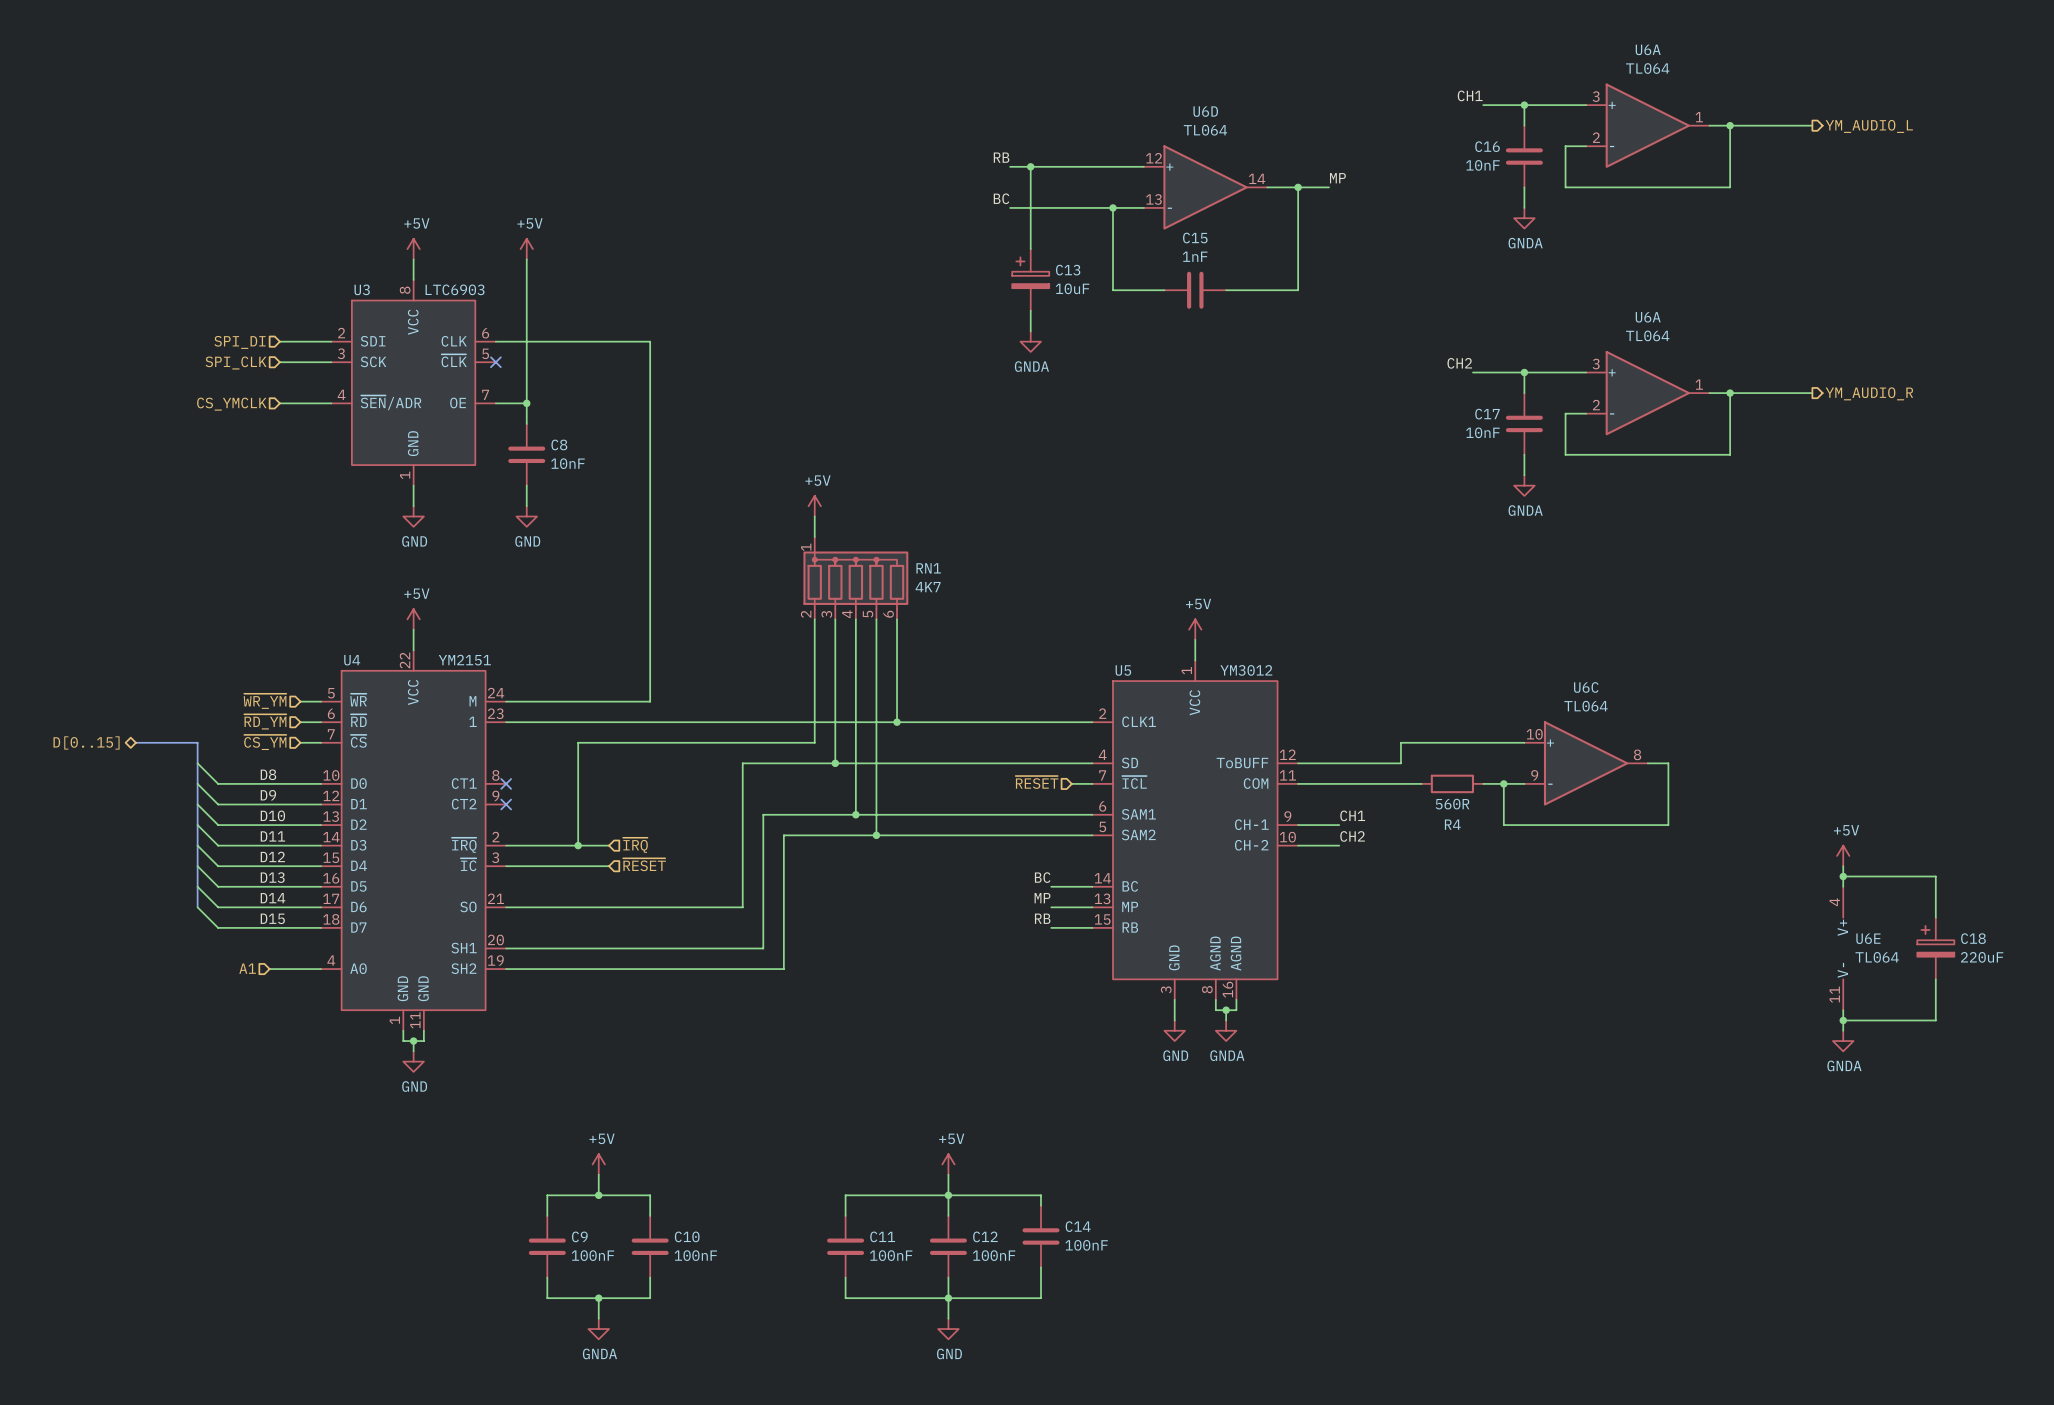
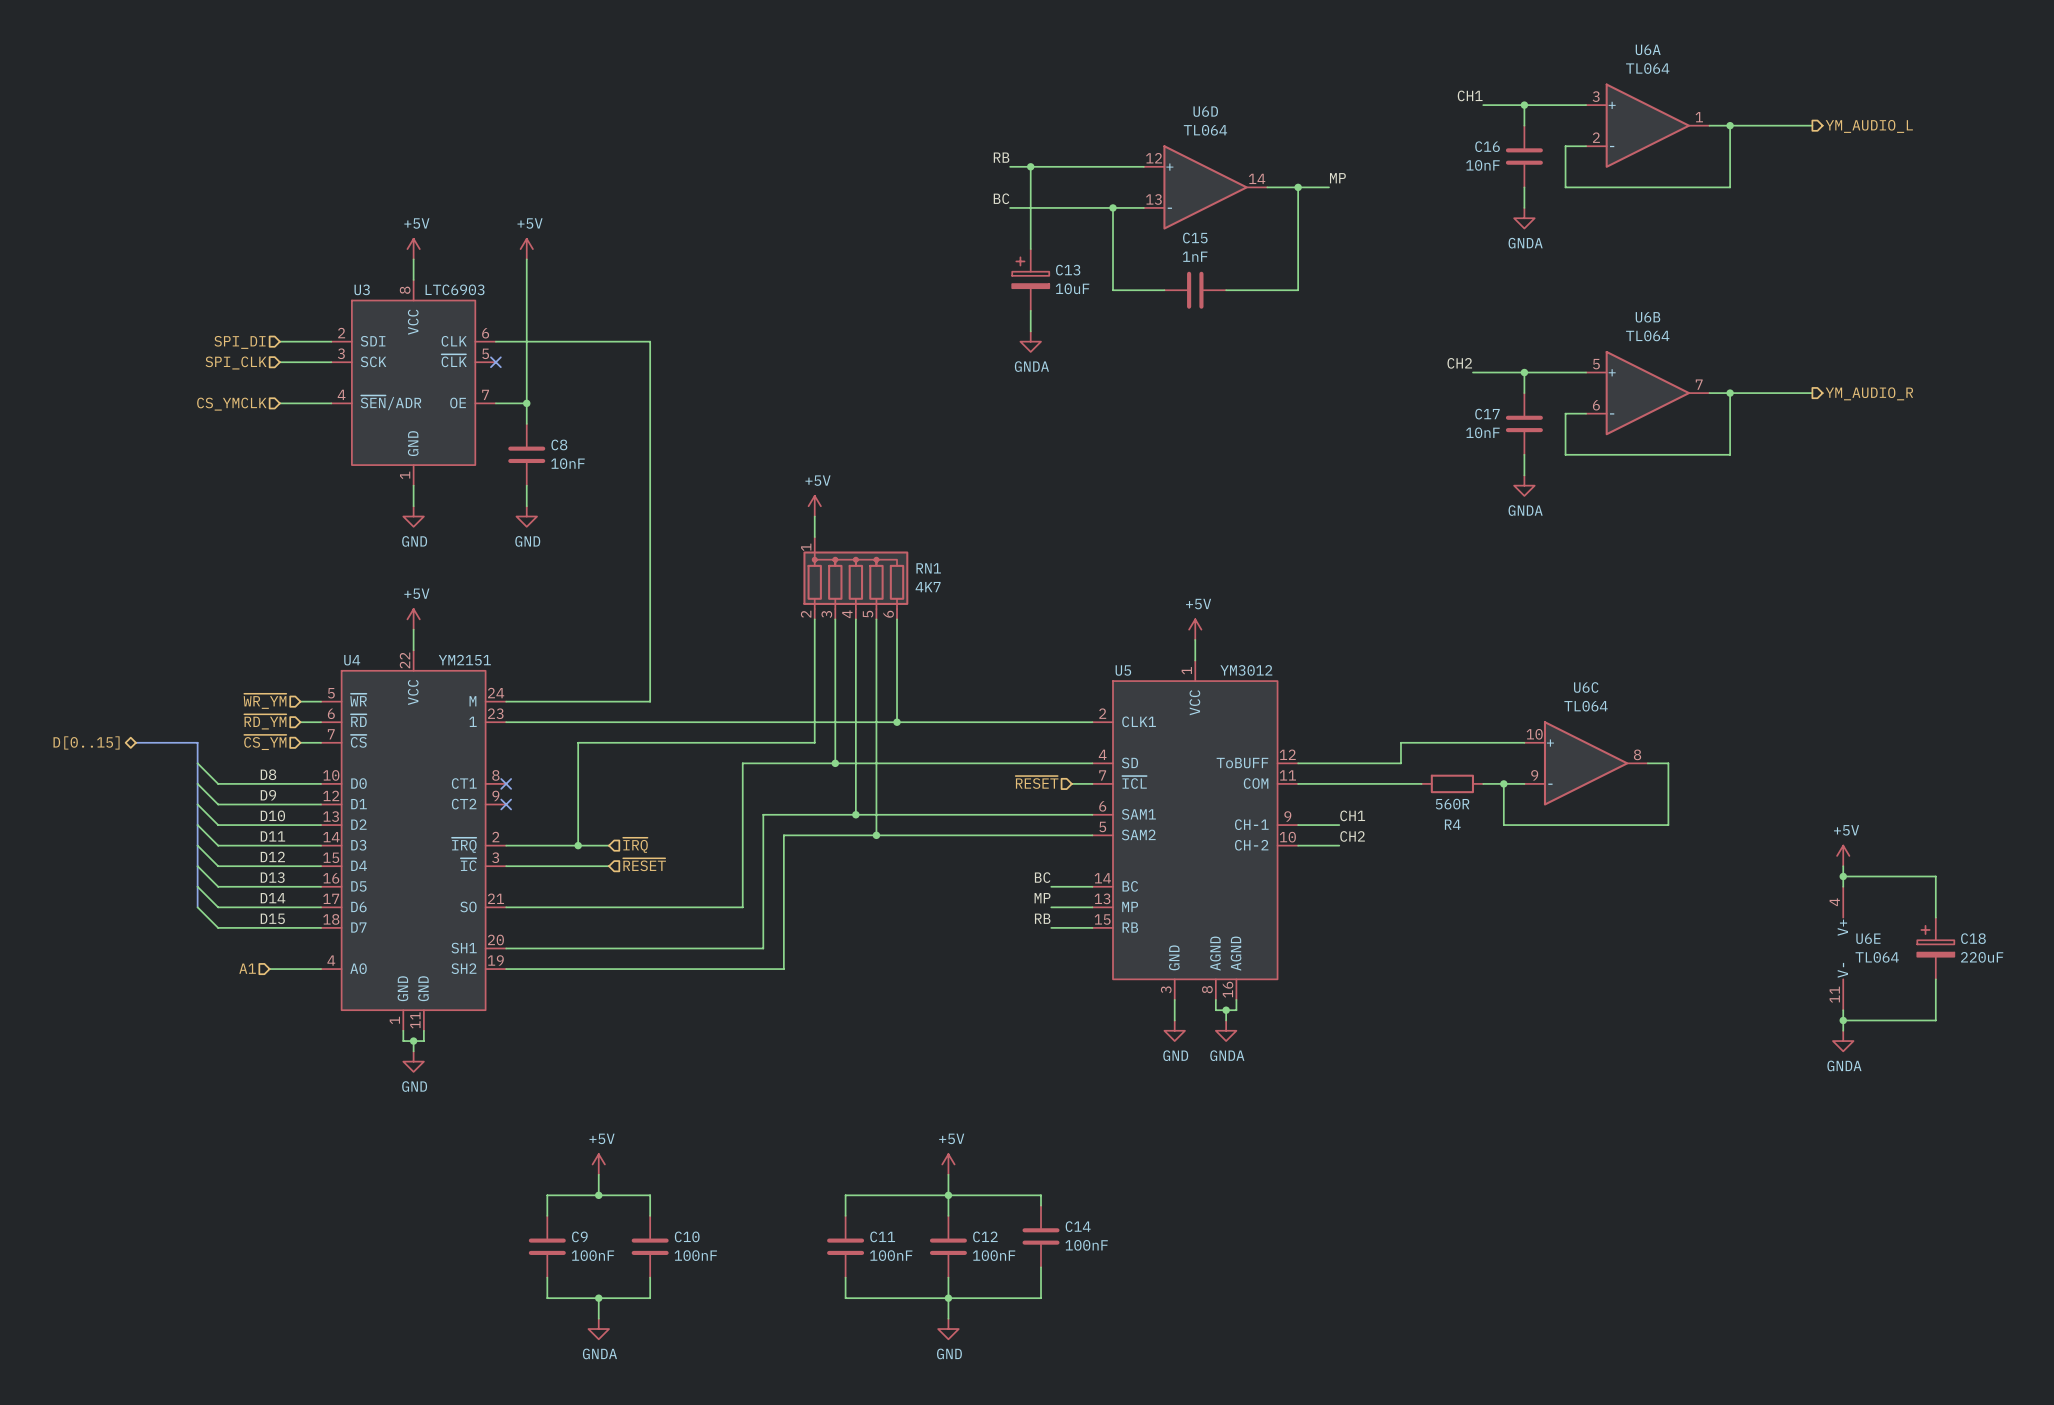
U6A name: U6A (1648, 317) -> U6B (1647, 317)
U6A pin number: 3 (1596, 364) -> 5 (1596, 364)
U6A pin number: 1 (1699, 384) -> 7 (1699, 384)
U6A pin number: 2 (1596, 405) -> 6 (1596, 405)

